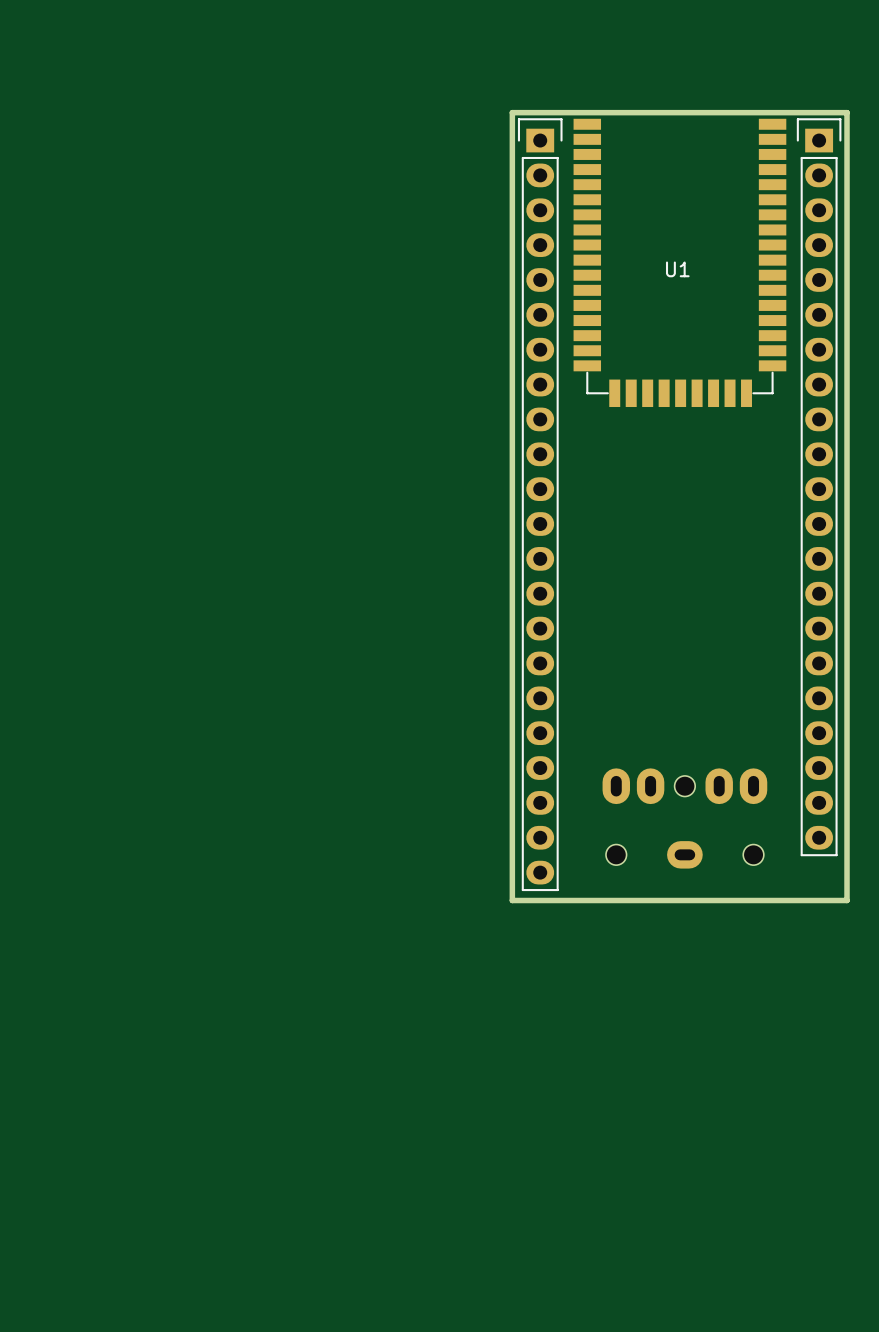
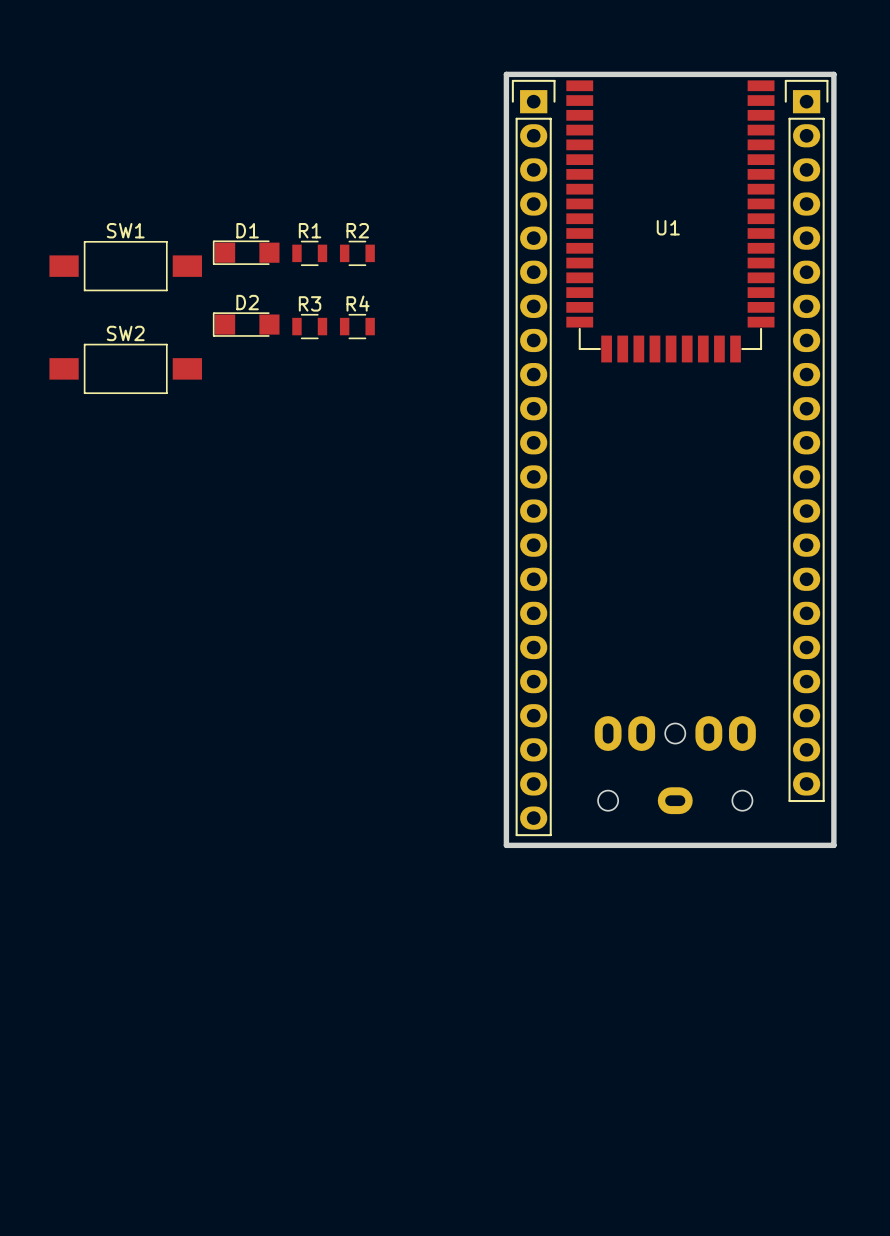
D1: none -> (246, 252)
R1: none -> (309, 253)
R2: none -> (357, 253)
SW1: none -> (125, 266)
D2: none -> (246, 324)
R3: none -> (309, 326)
R4: none -> (357, 326)
SW2: none -> (125, 368)

